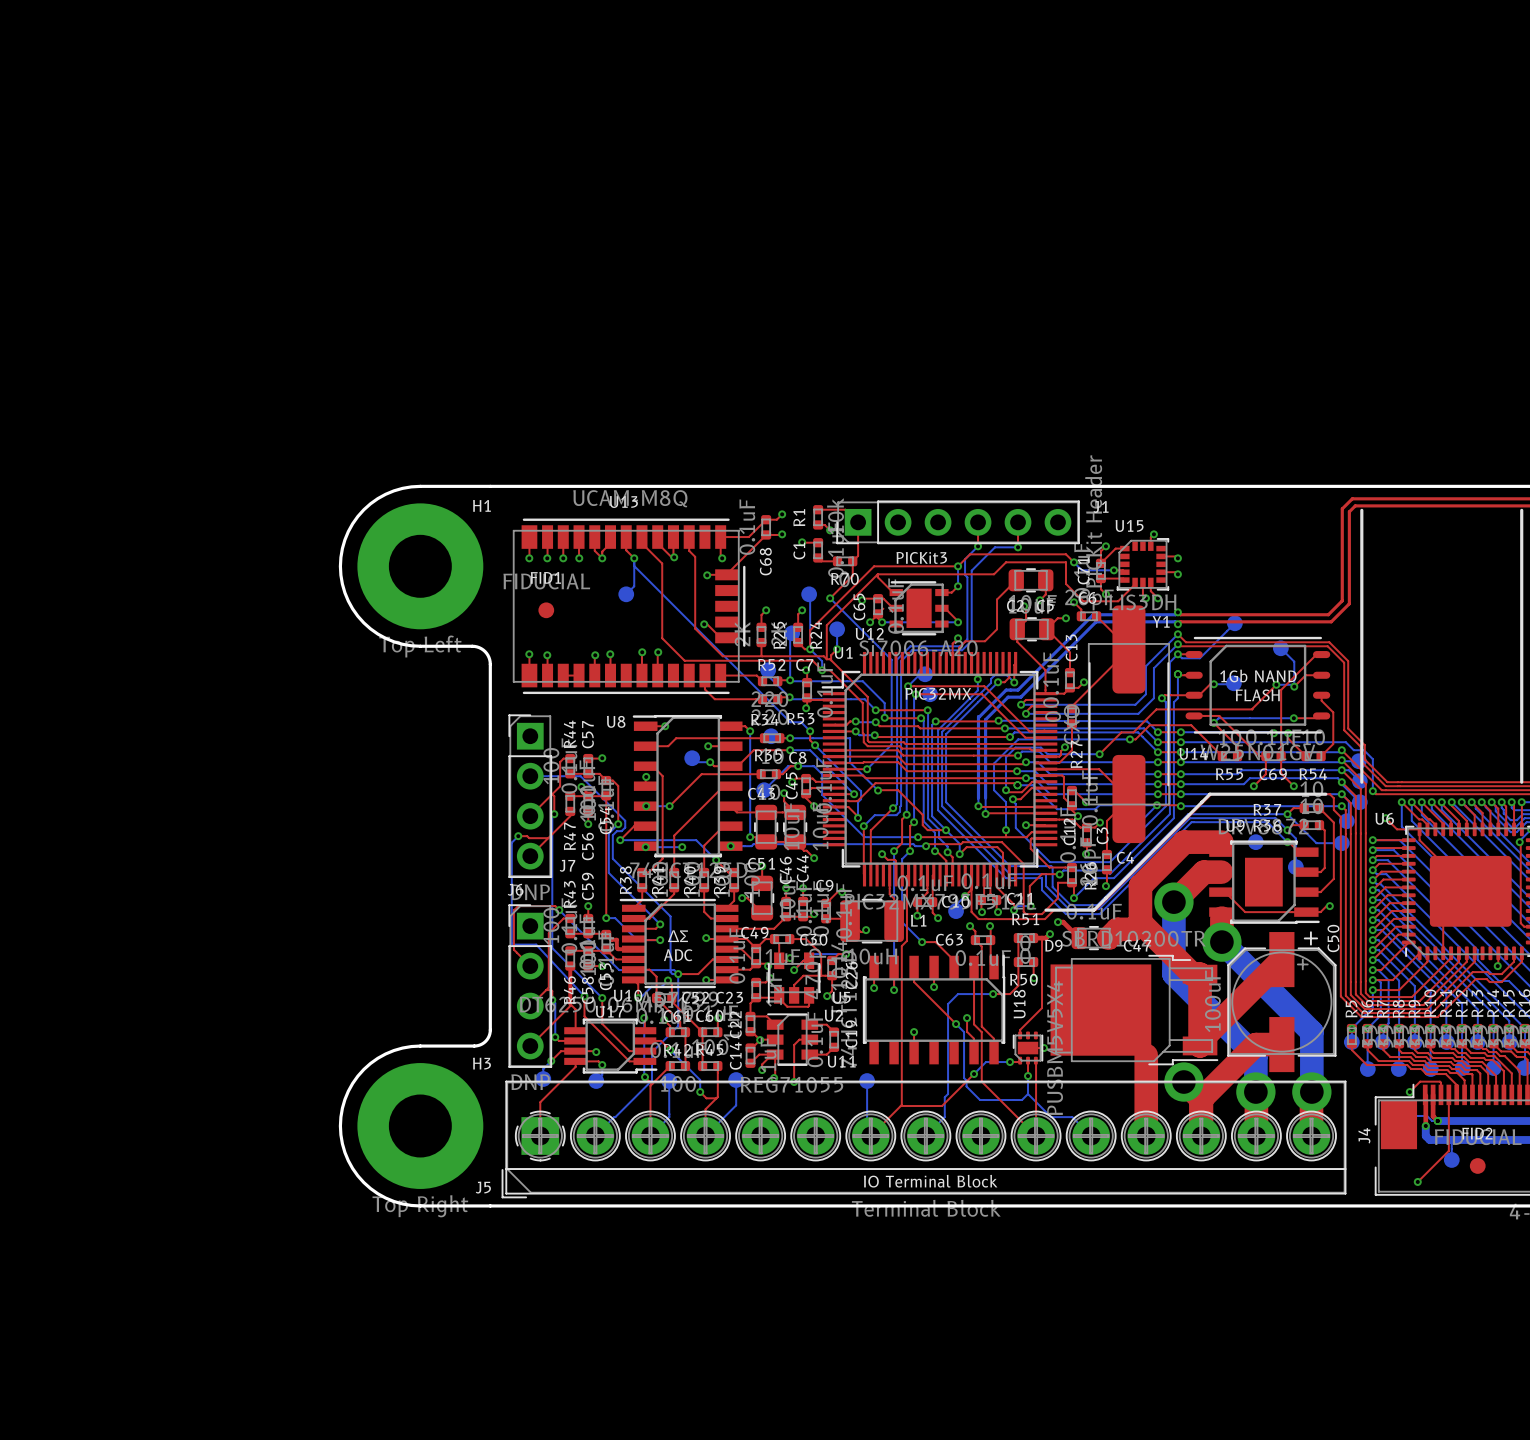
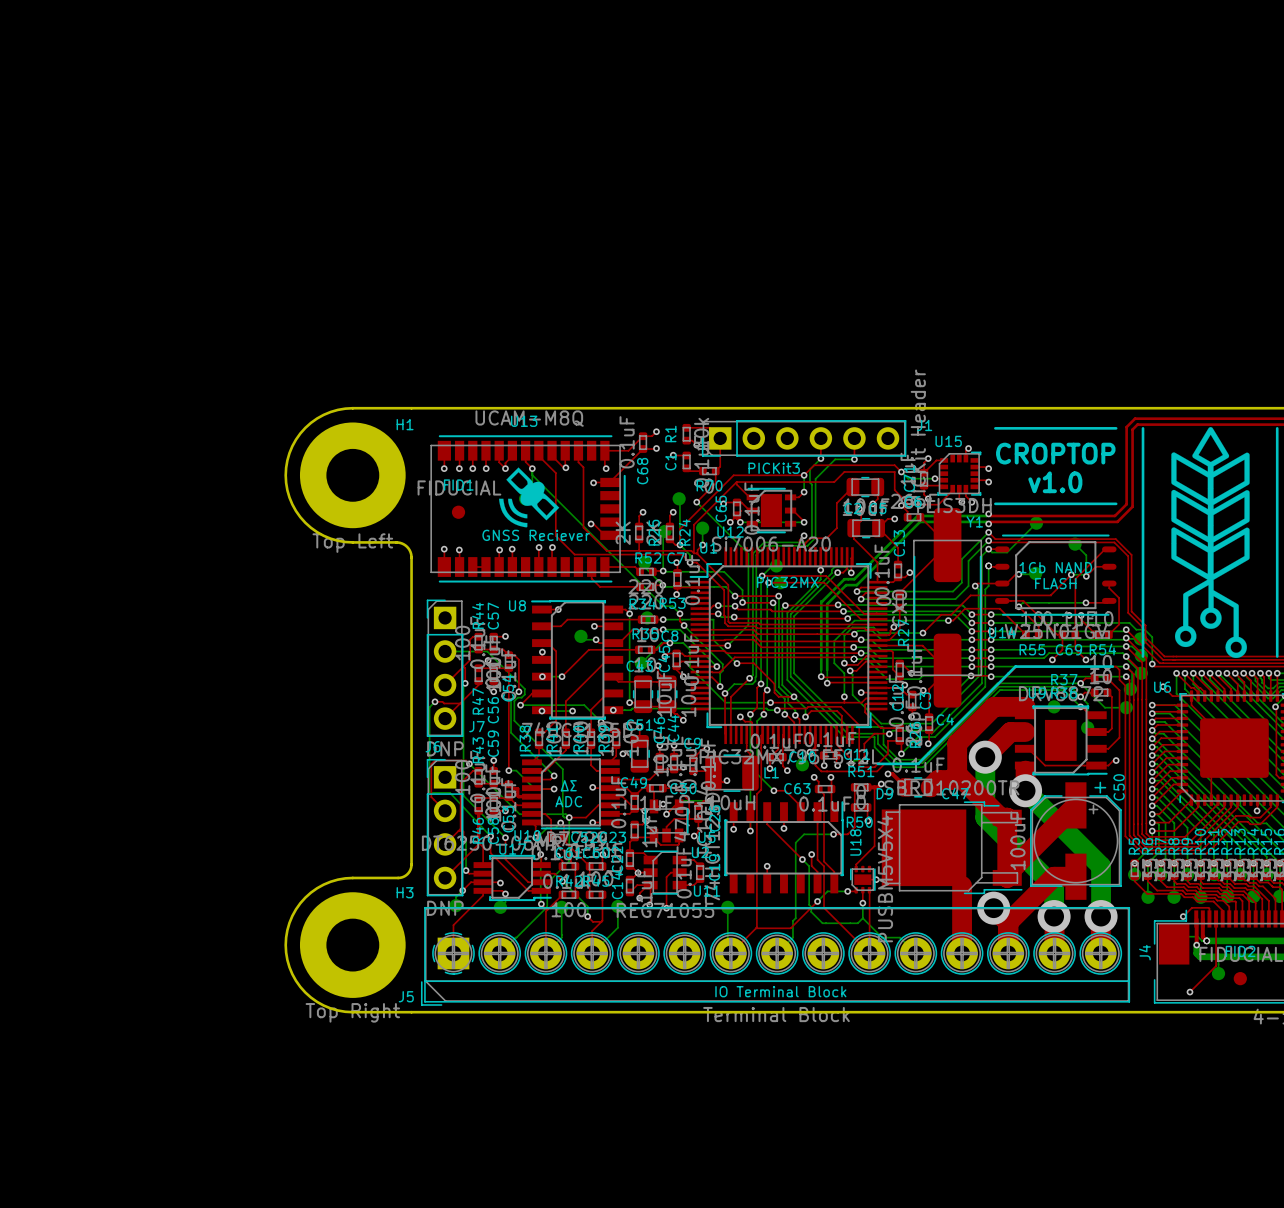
drawing: none -> [1171, 427, 1250, 658]
line: none -> (995, 428) (1116, 428)
text: none -> CROPTOP (1055, 453)
drawing: none -> [499, 467, 560, 528]
text: none -> v1.0 (1055, 482)
line: none -> (995, 503) (1116, 503)
text: none -> GNSS Reciever (536, 535)

